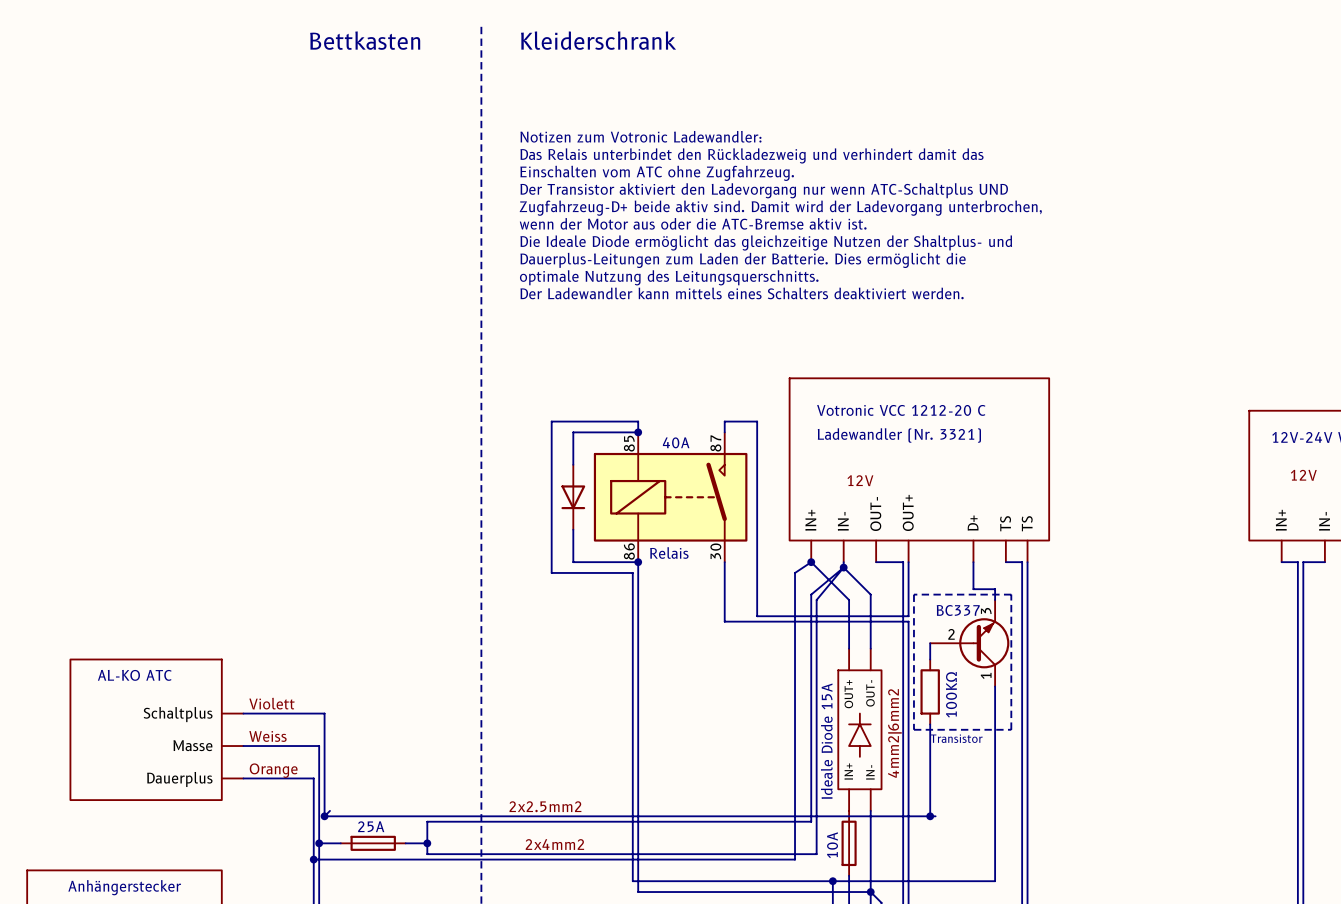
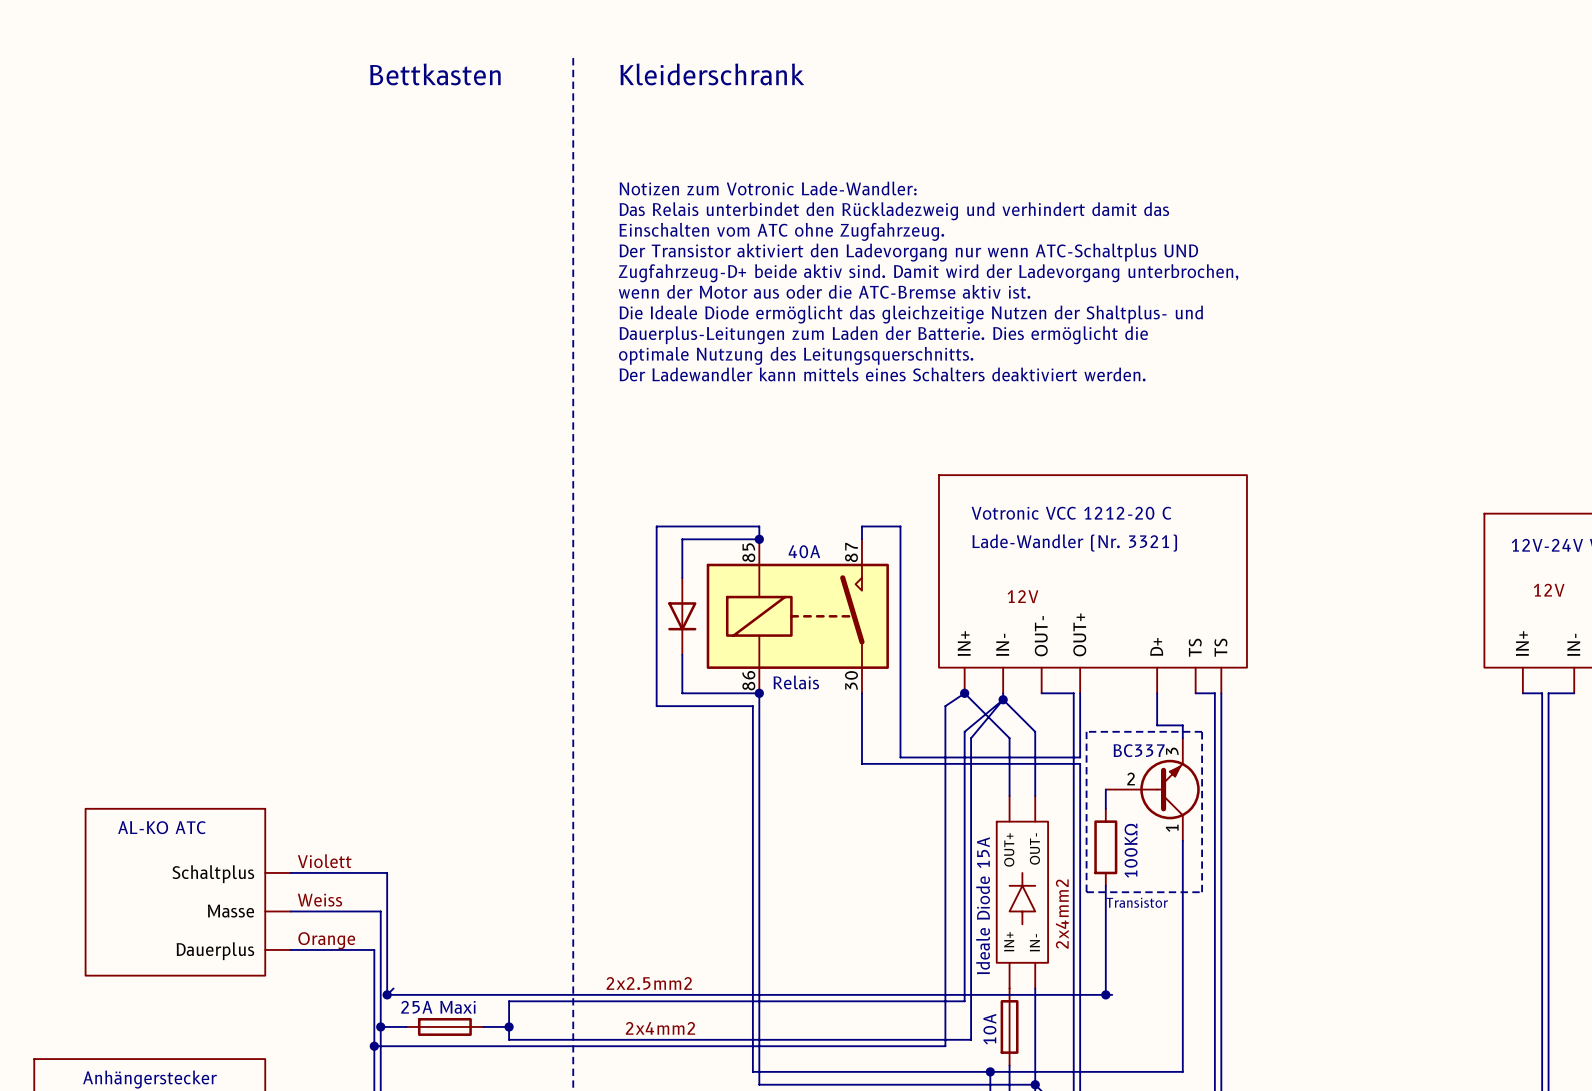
text: Notizen zum Votronic Ladewandler: (640, 136) -> Notizen zum Votronic Lade-Wandler: (768, 188)
text: Ladewandler (Nr. 3321) (899, 435) -> Lade-Wandler (Nr. 3321) (1074, 542)
label: 4mm2|6mm2 (894, 733) -> 2x4mm2 (1062, 914)
part value: 25A (371, 826) -> 25A Maxi (438, 1007)

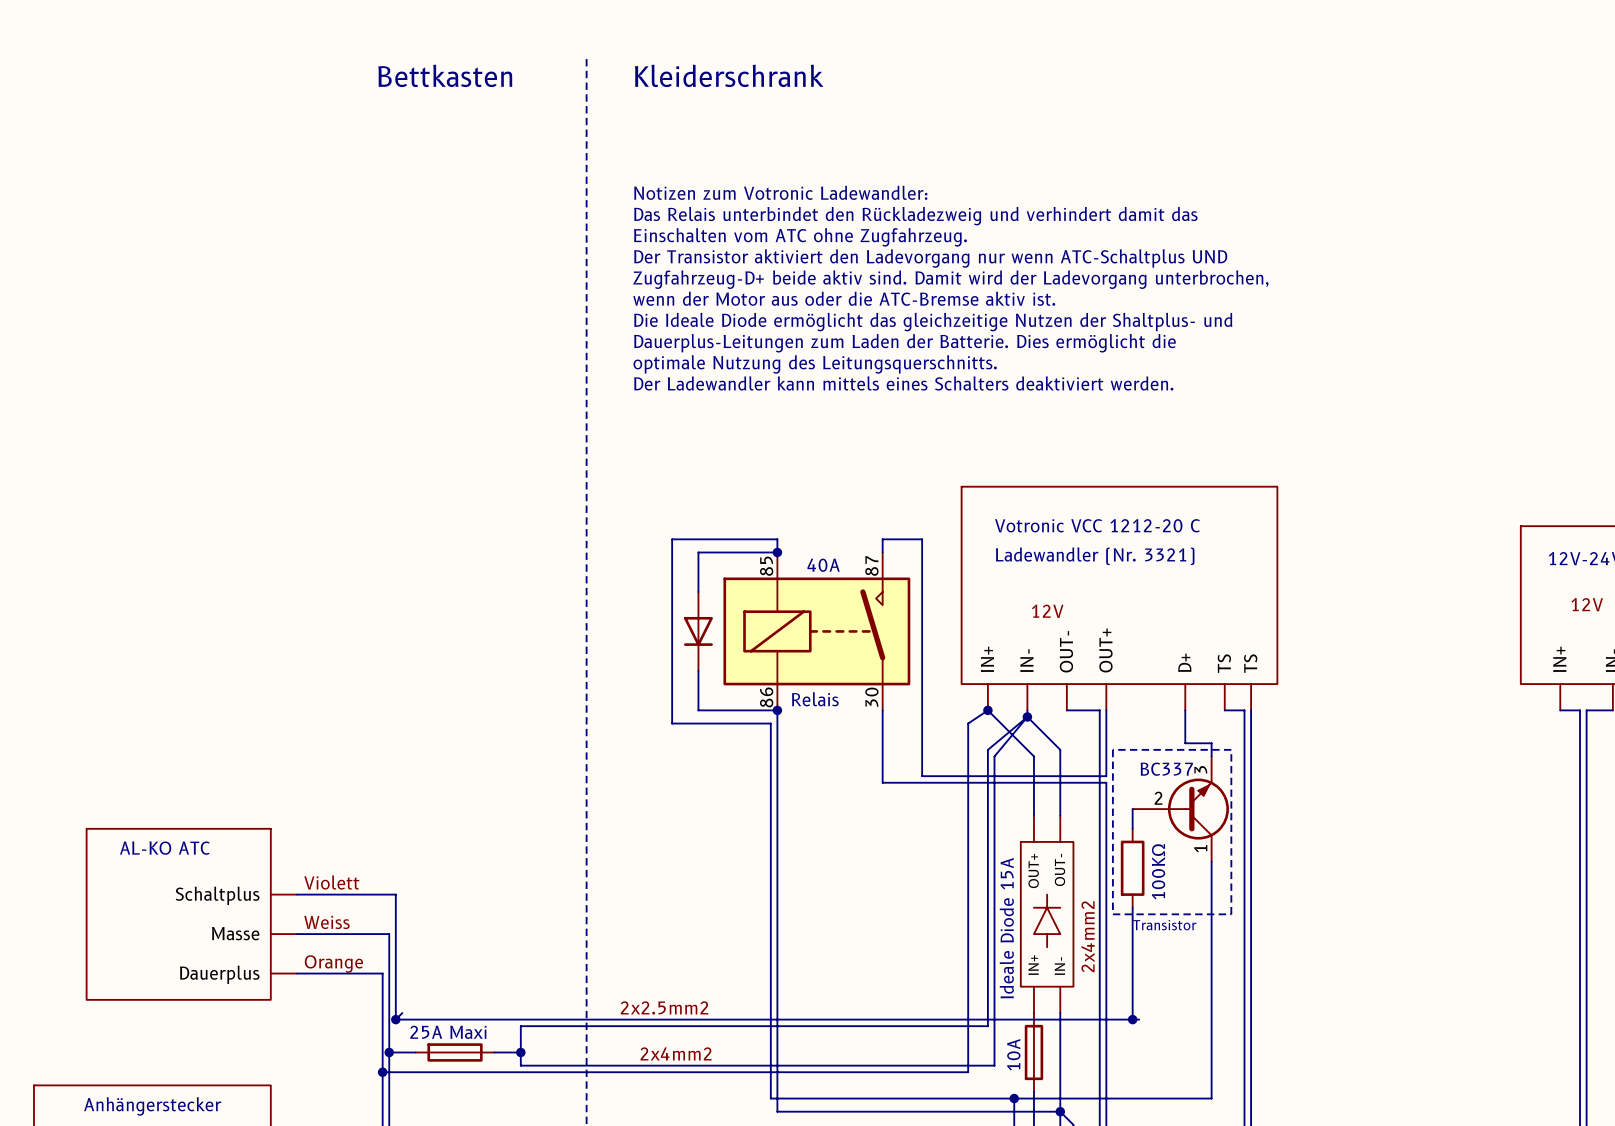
text: Notizen zum Votronic Lade-Wandler: (768, 188) -> Notizen zum Votronic Ladewandler: (780, 192)
text: Lade-Wandler (Nr. 3321) (1074, 542) -> Ladewandler (Nr. 3321) (1095, 556)

